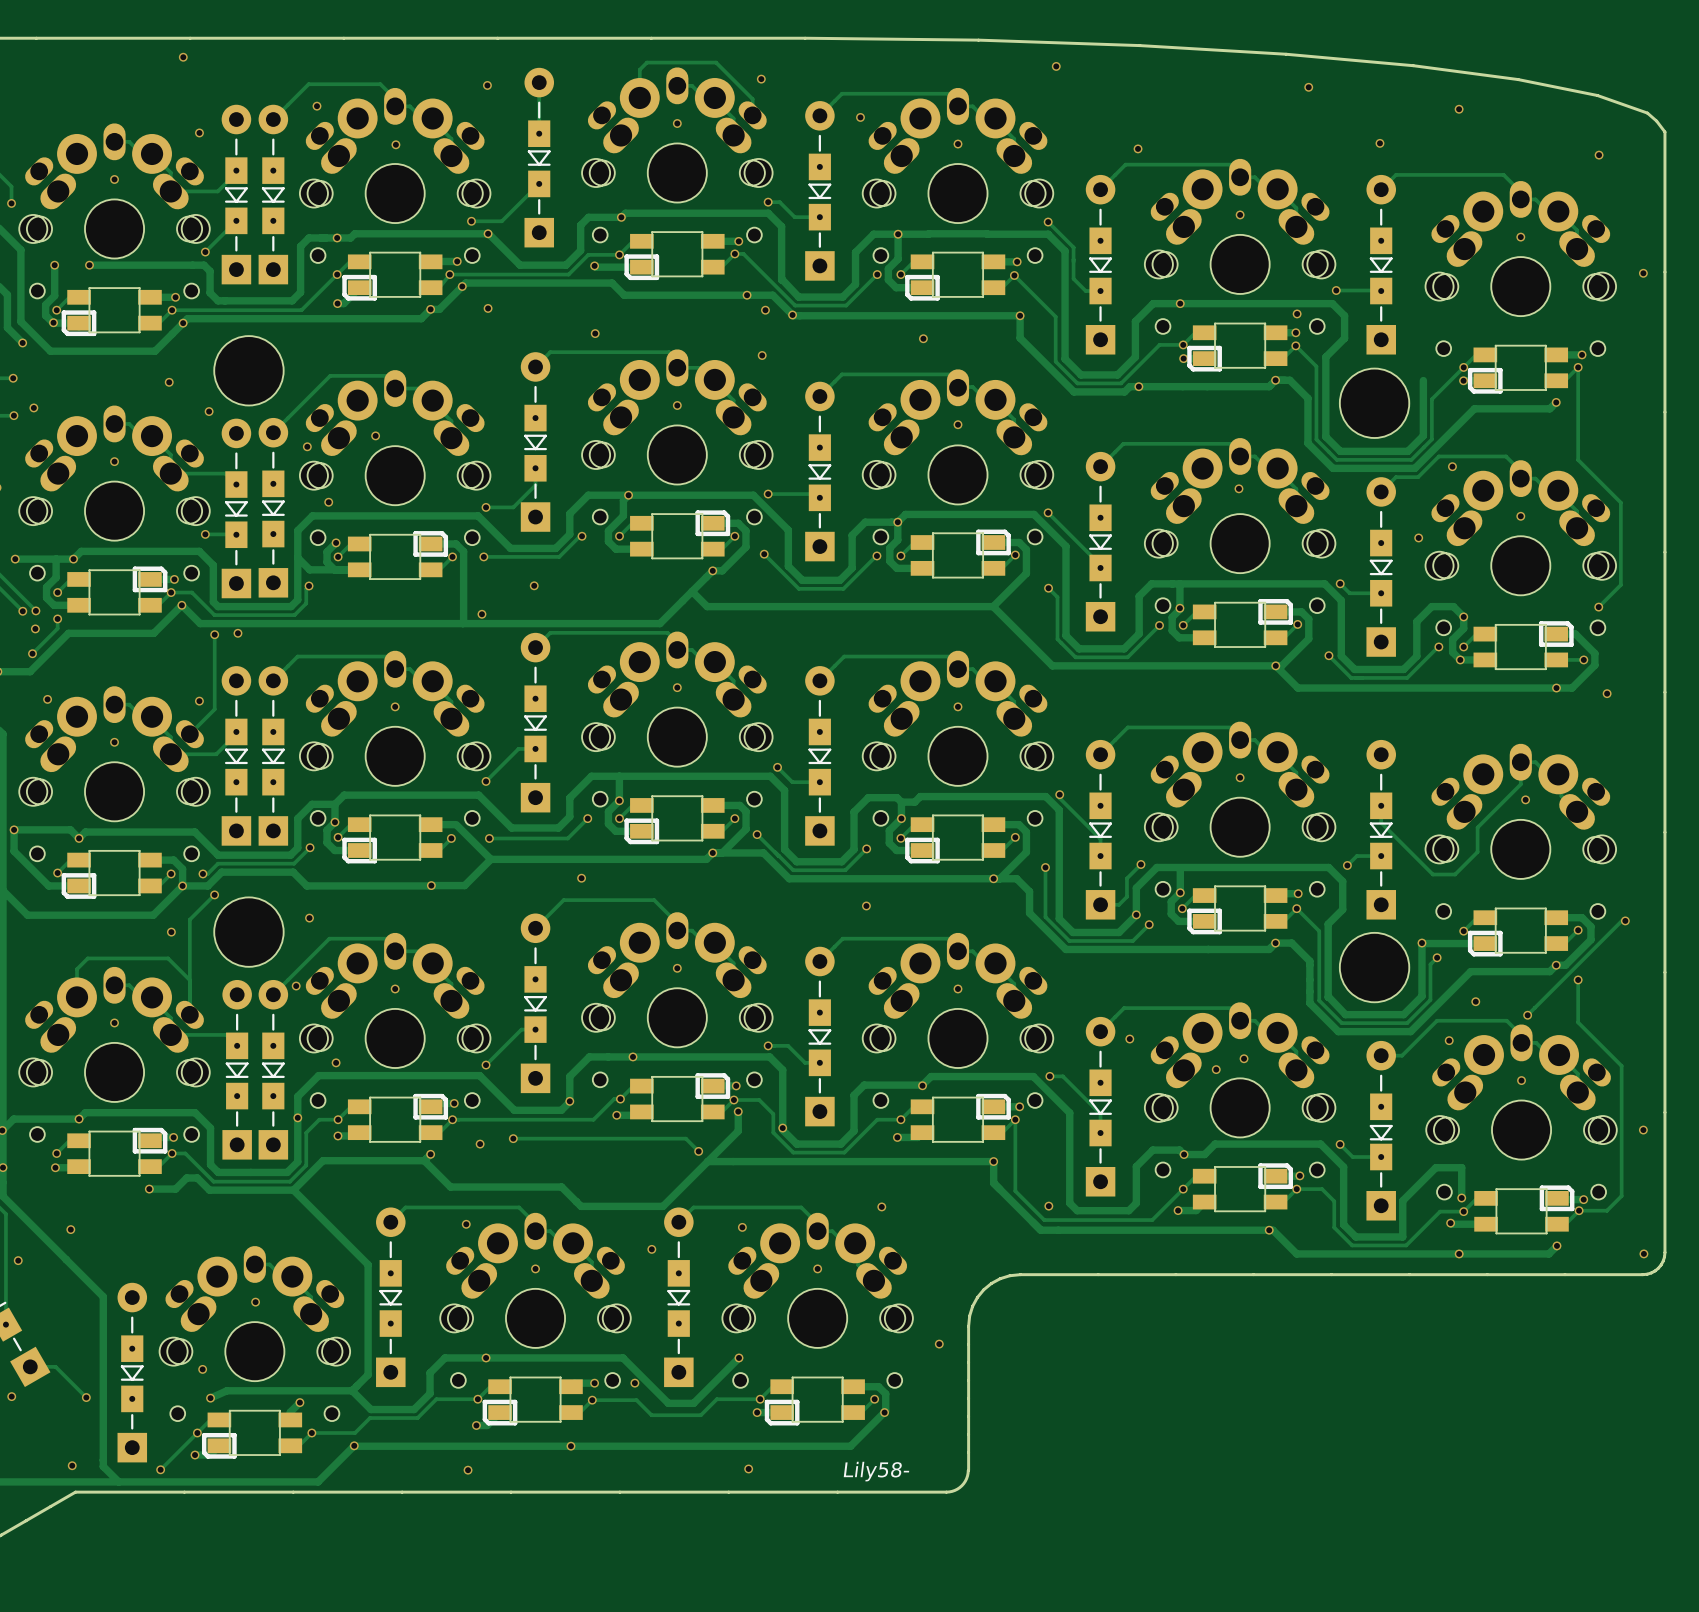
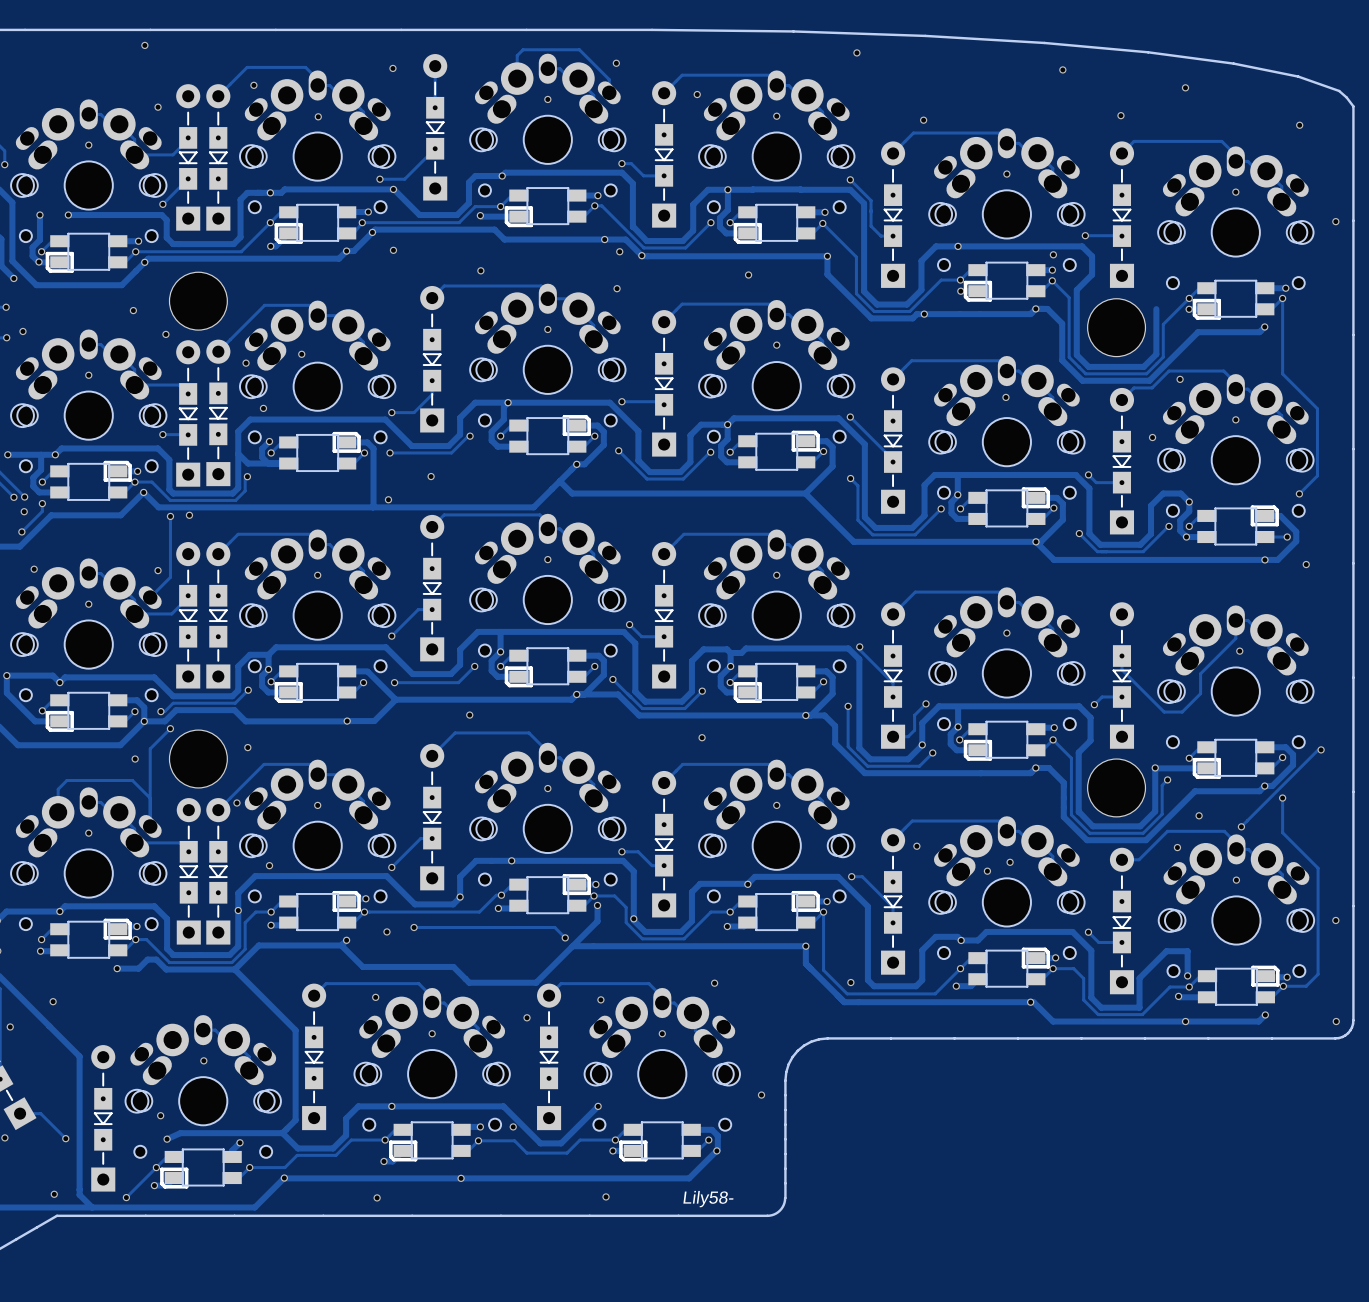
part footprint: [214, 336, 284, 406] -> [168, 271, 228, 331]
part footprint: [1339, 368, 1410, 439] -> [1087, 298, 1147, 358]
part footprint: [214, 897, 284, 967] -> [168, 729, 228, 789]
part footprint: [1339, 932, 1410, 1003] -> [1087, 758, 1147, 818]

